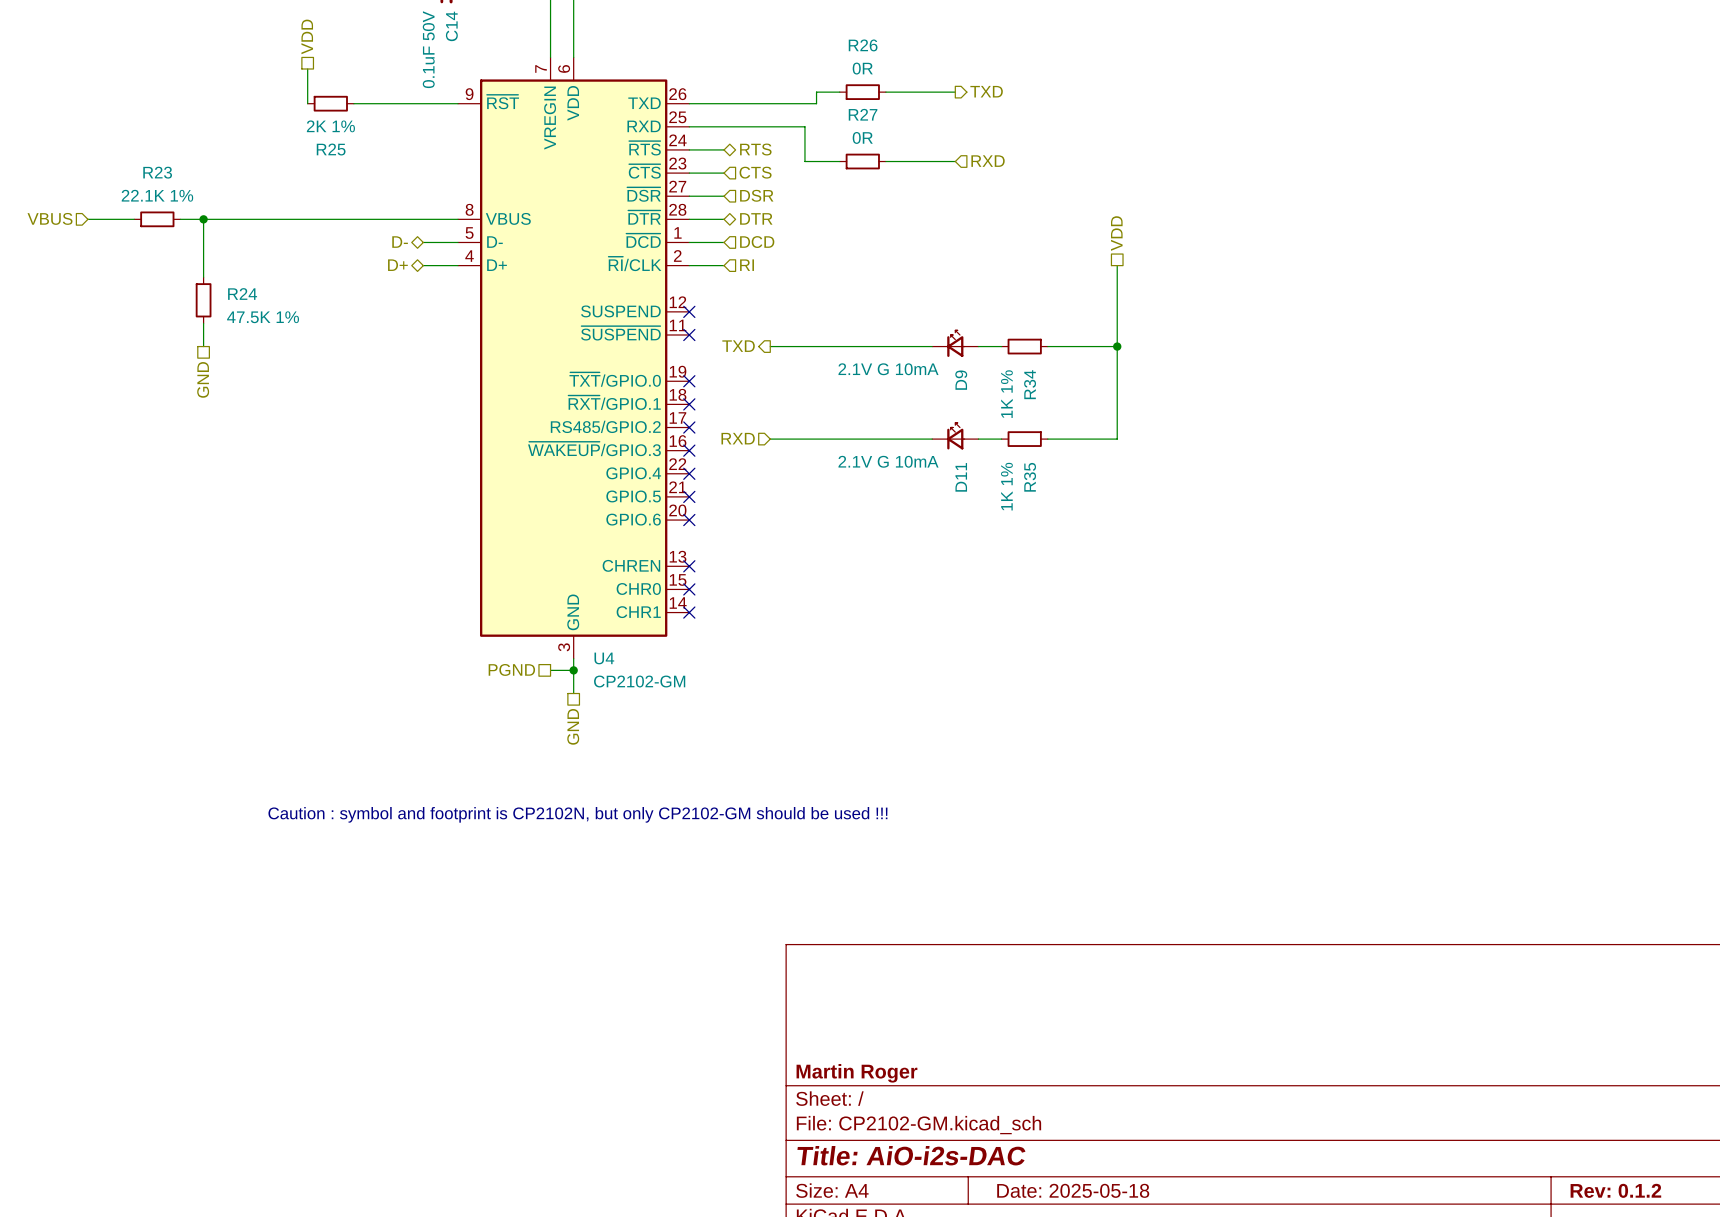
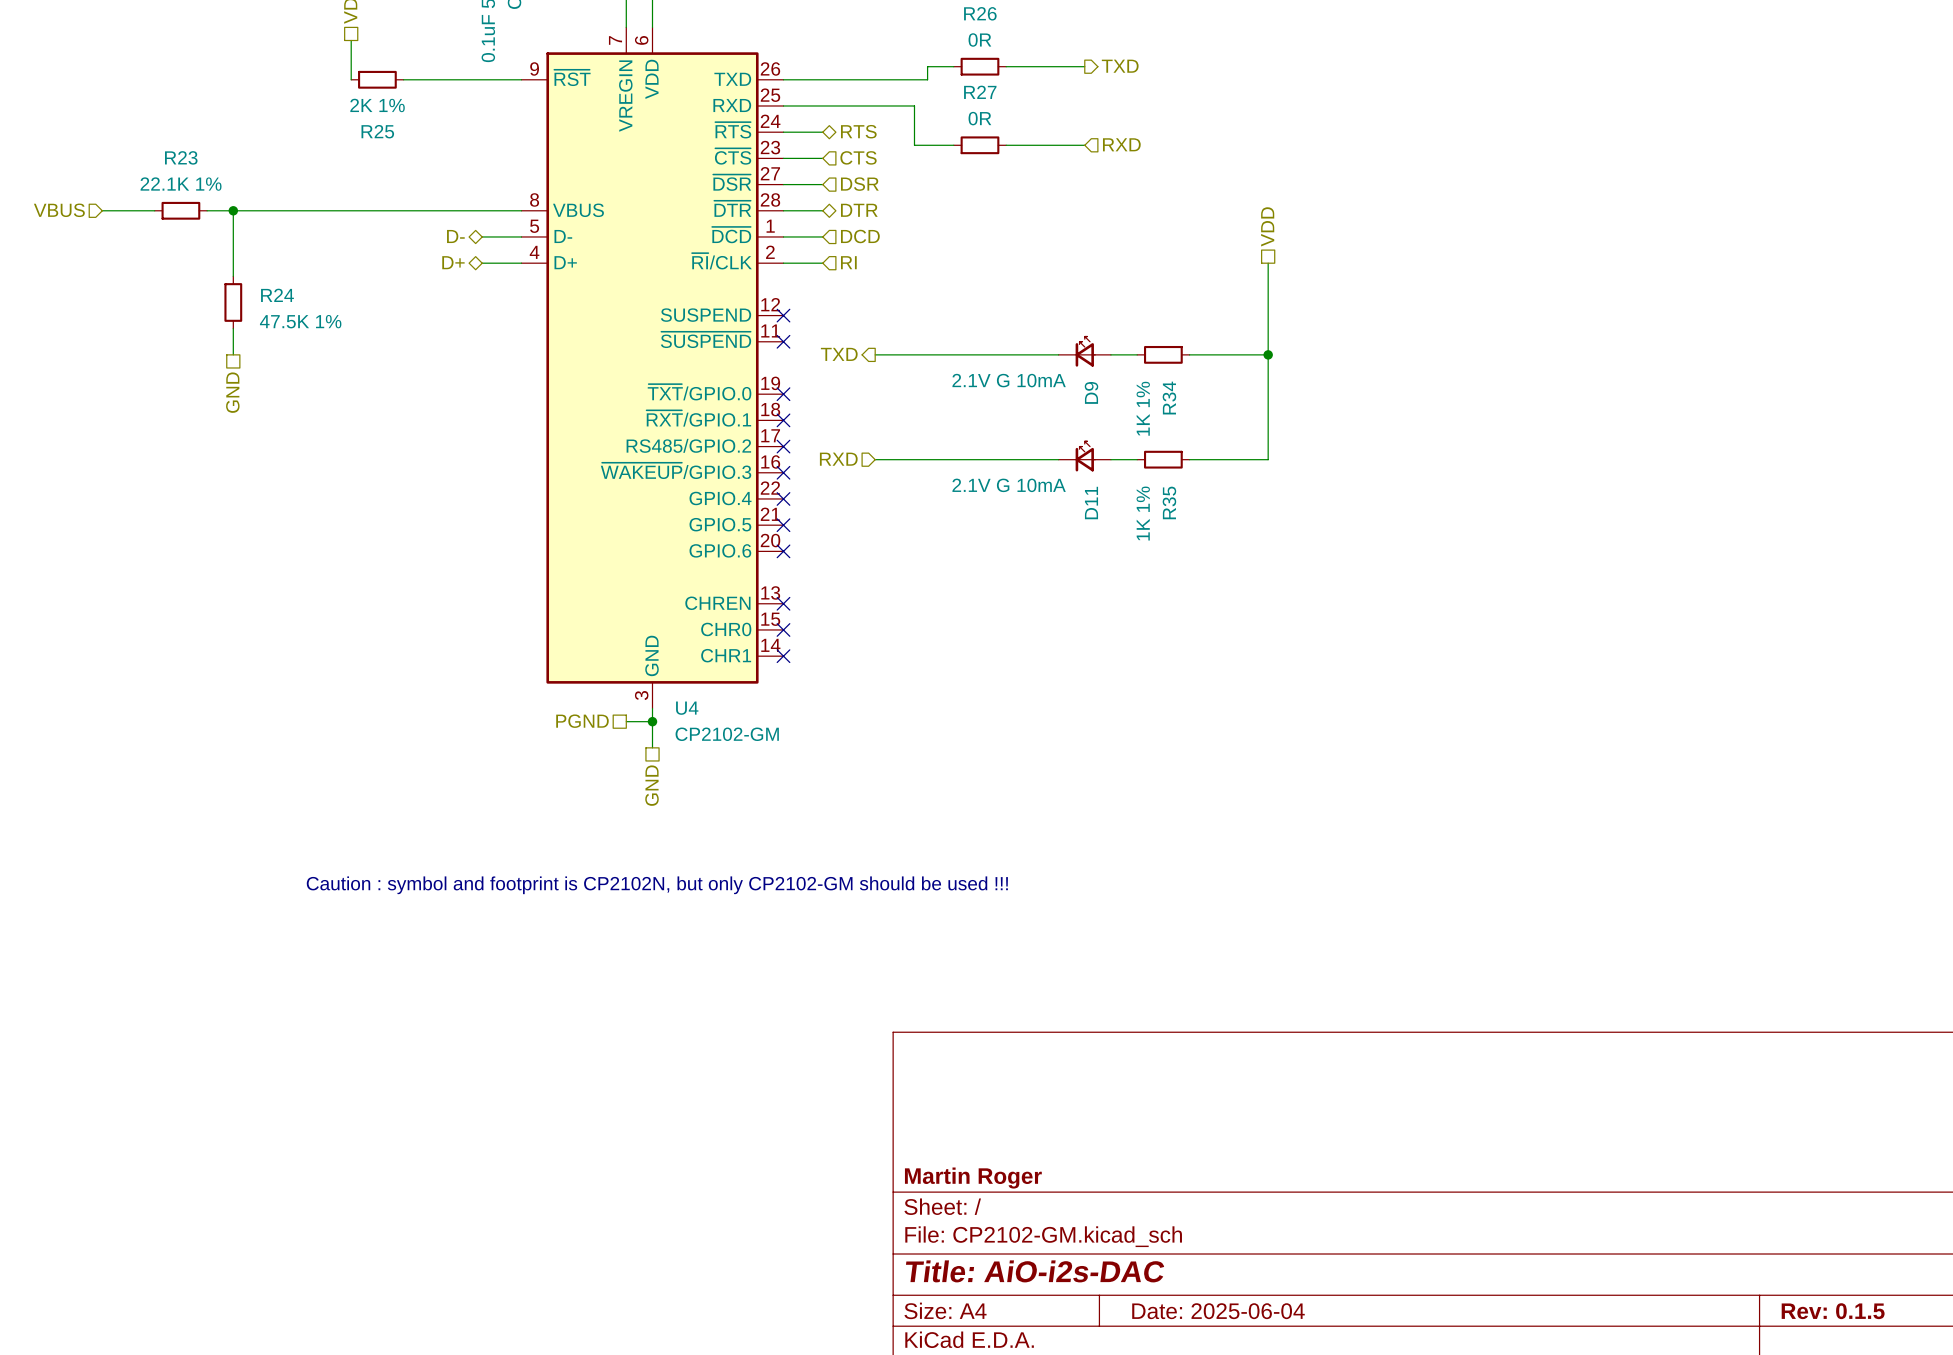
title block: Date: 2025-05-18 (1073, 1190) -> Date: 2025-06-04 (1218, 1311)
title block: Rev: 0.1.2 (1615, 1190) -> Rev: 0.1.5 (1833, 1311)

